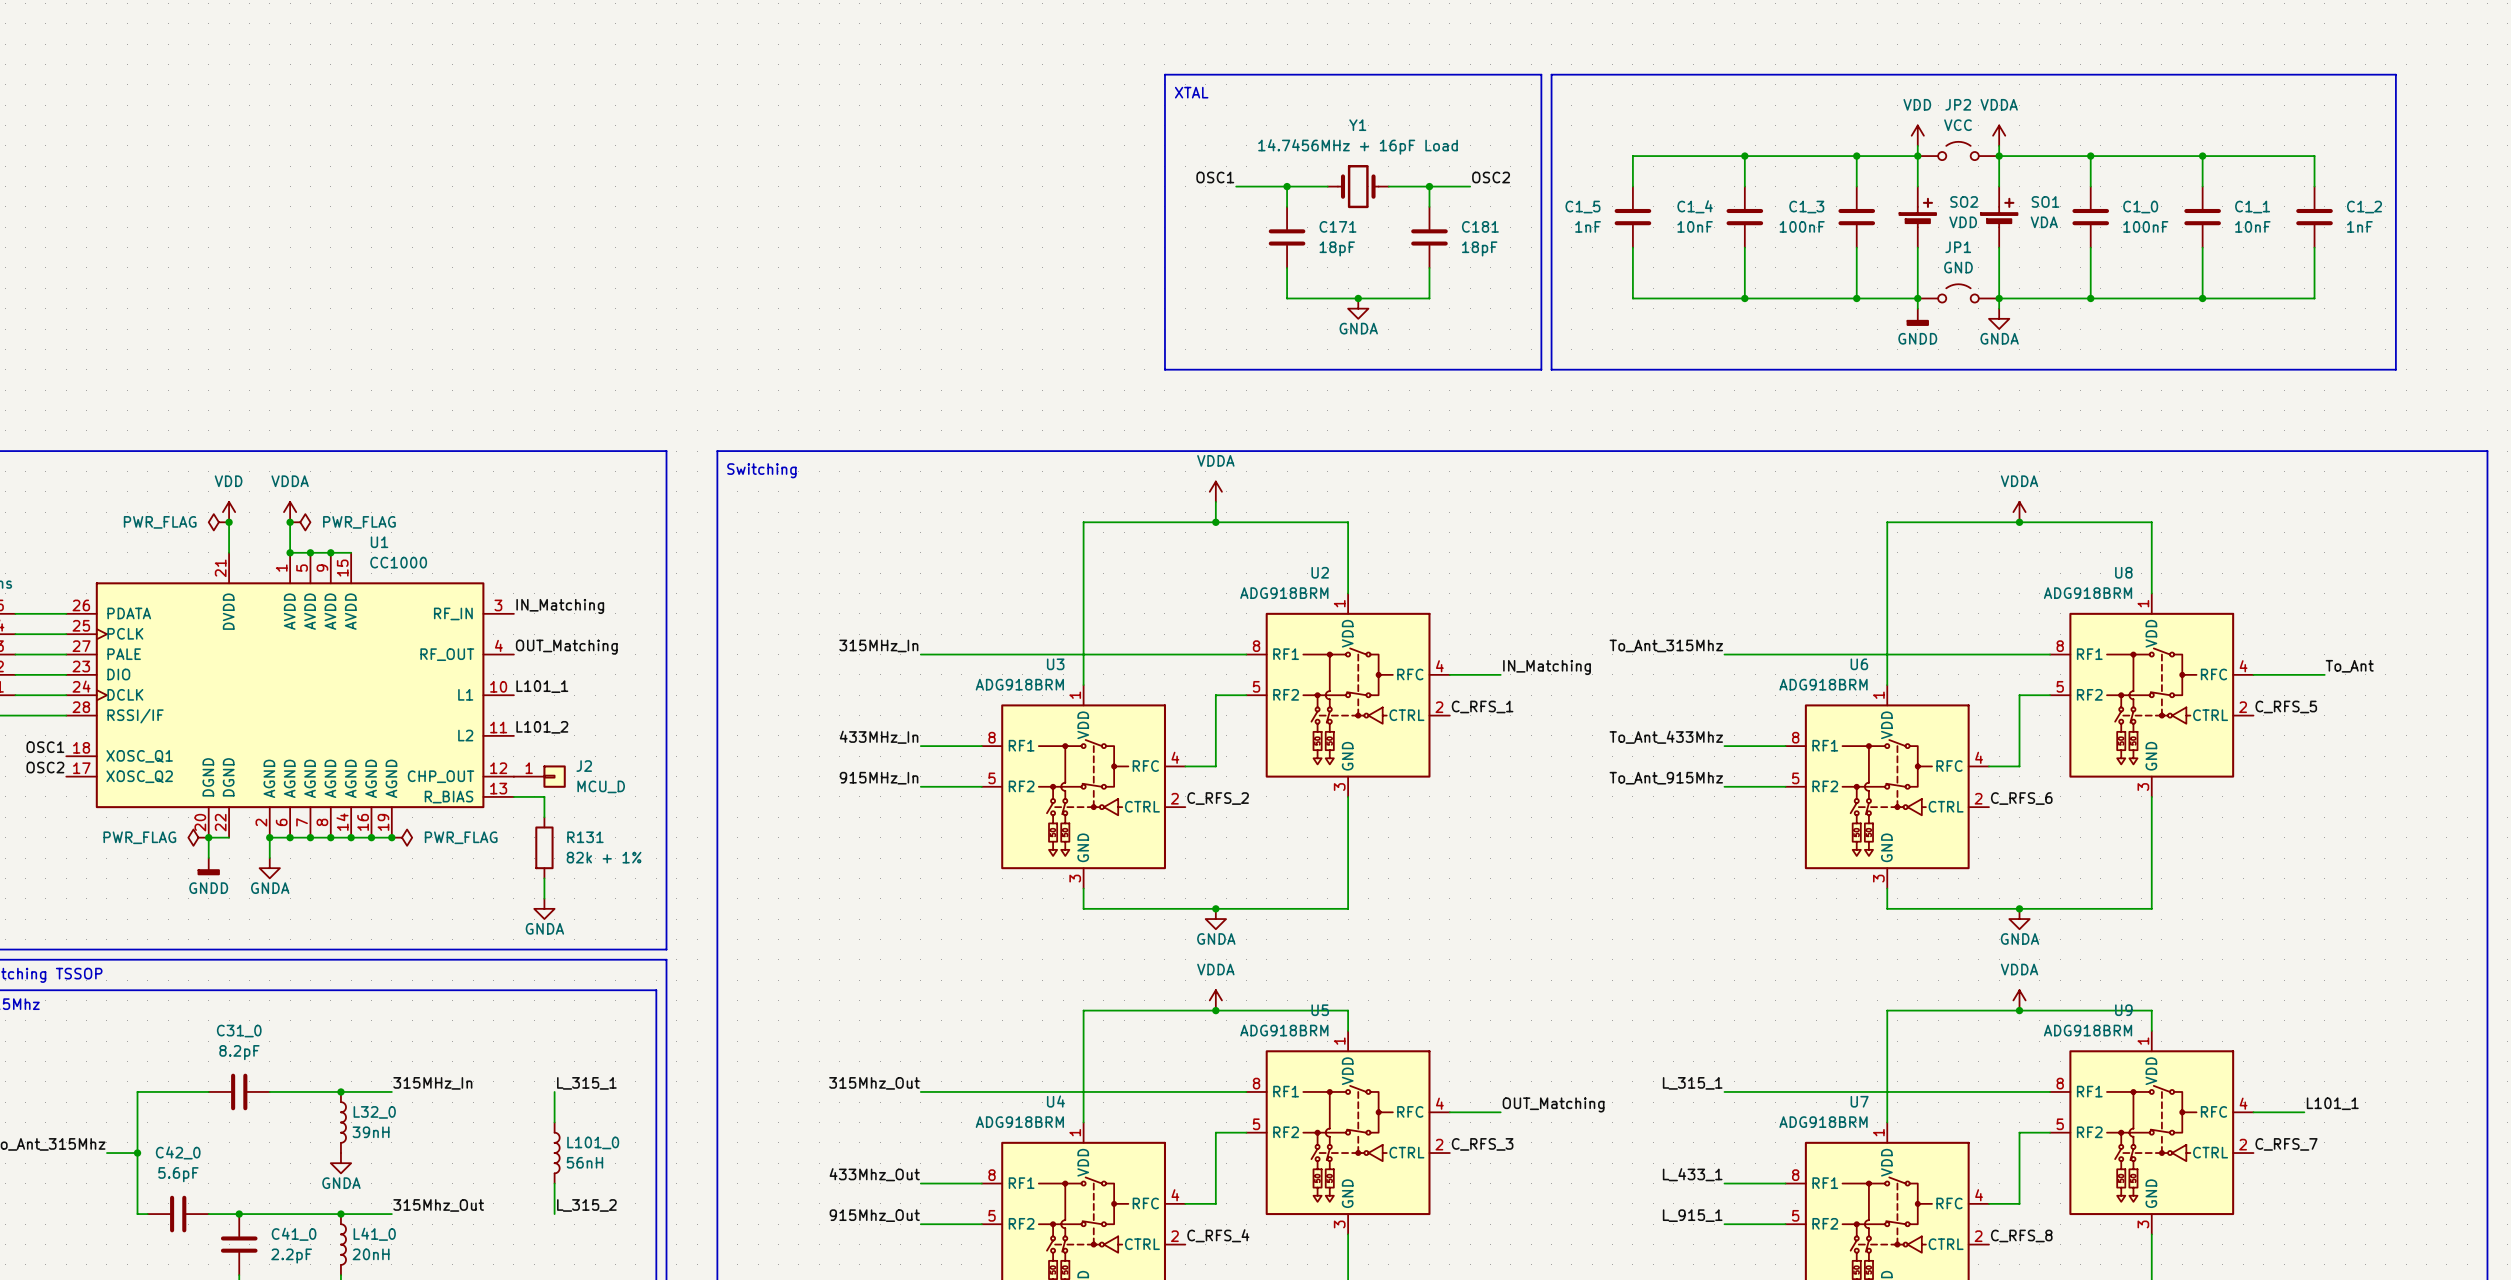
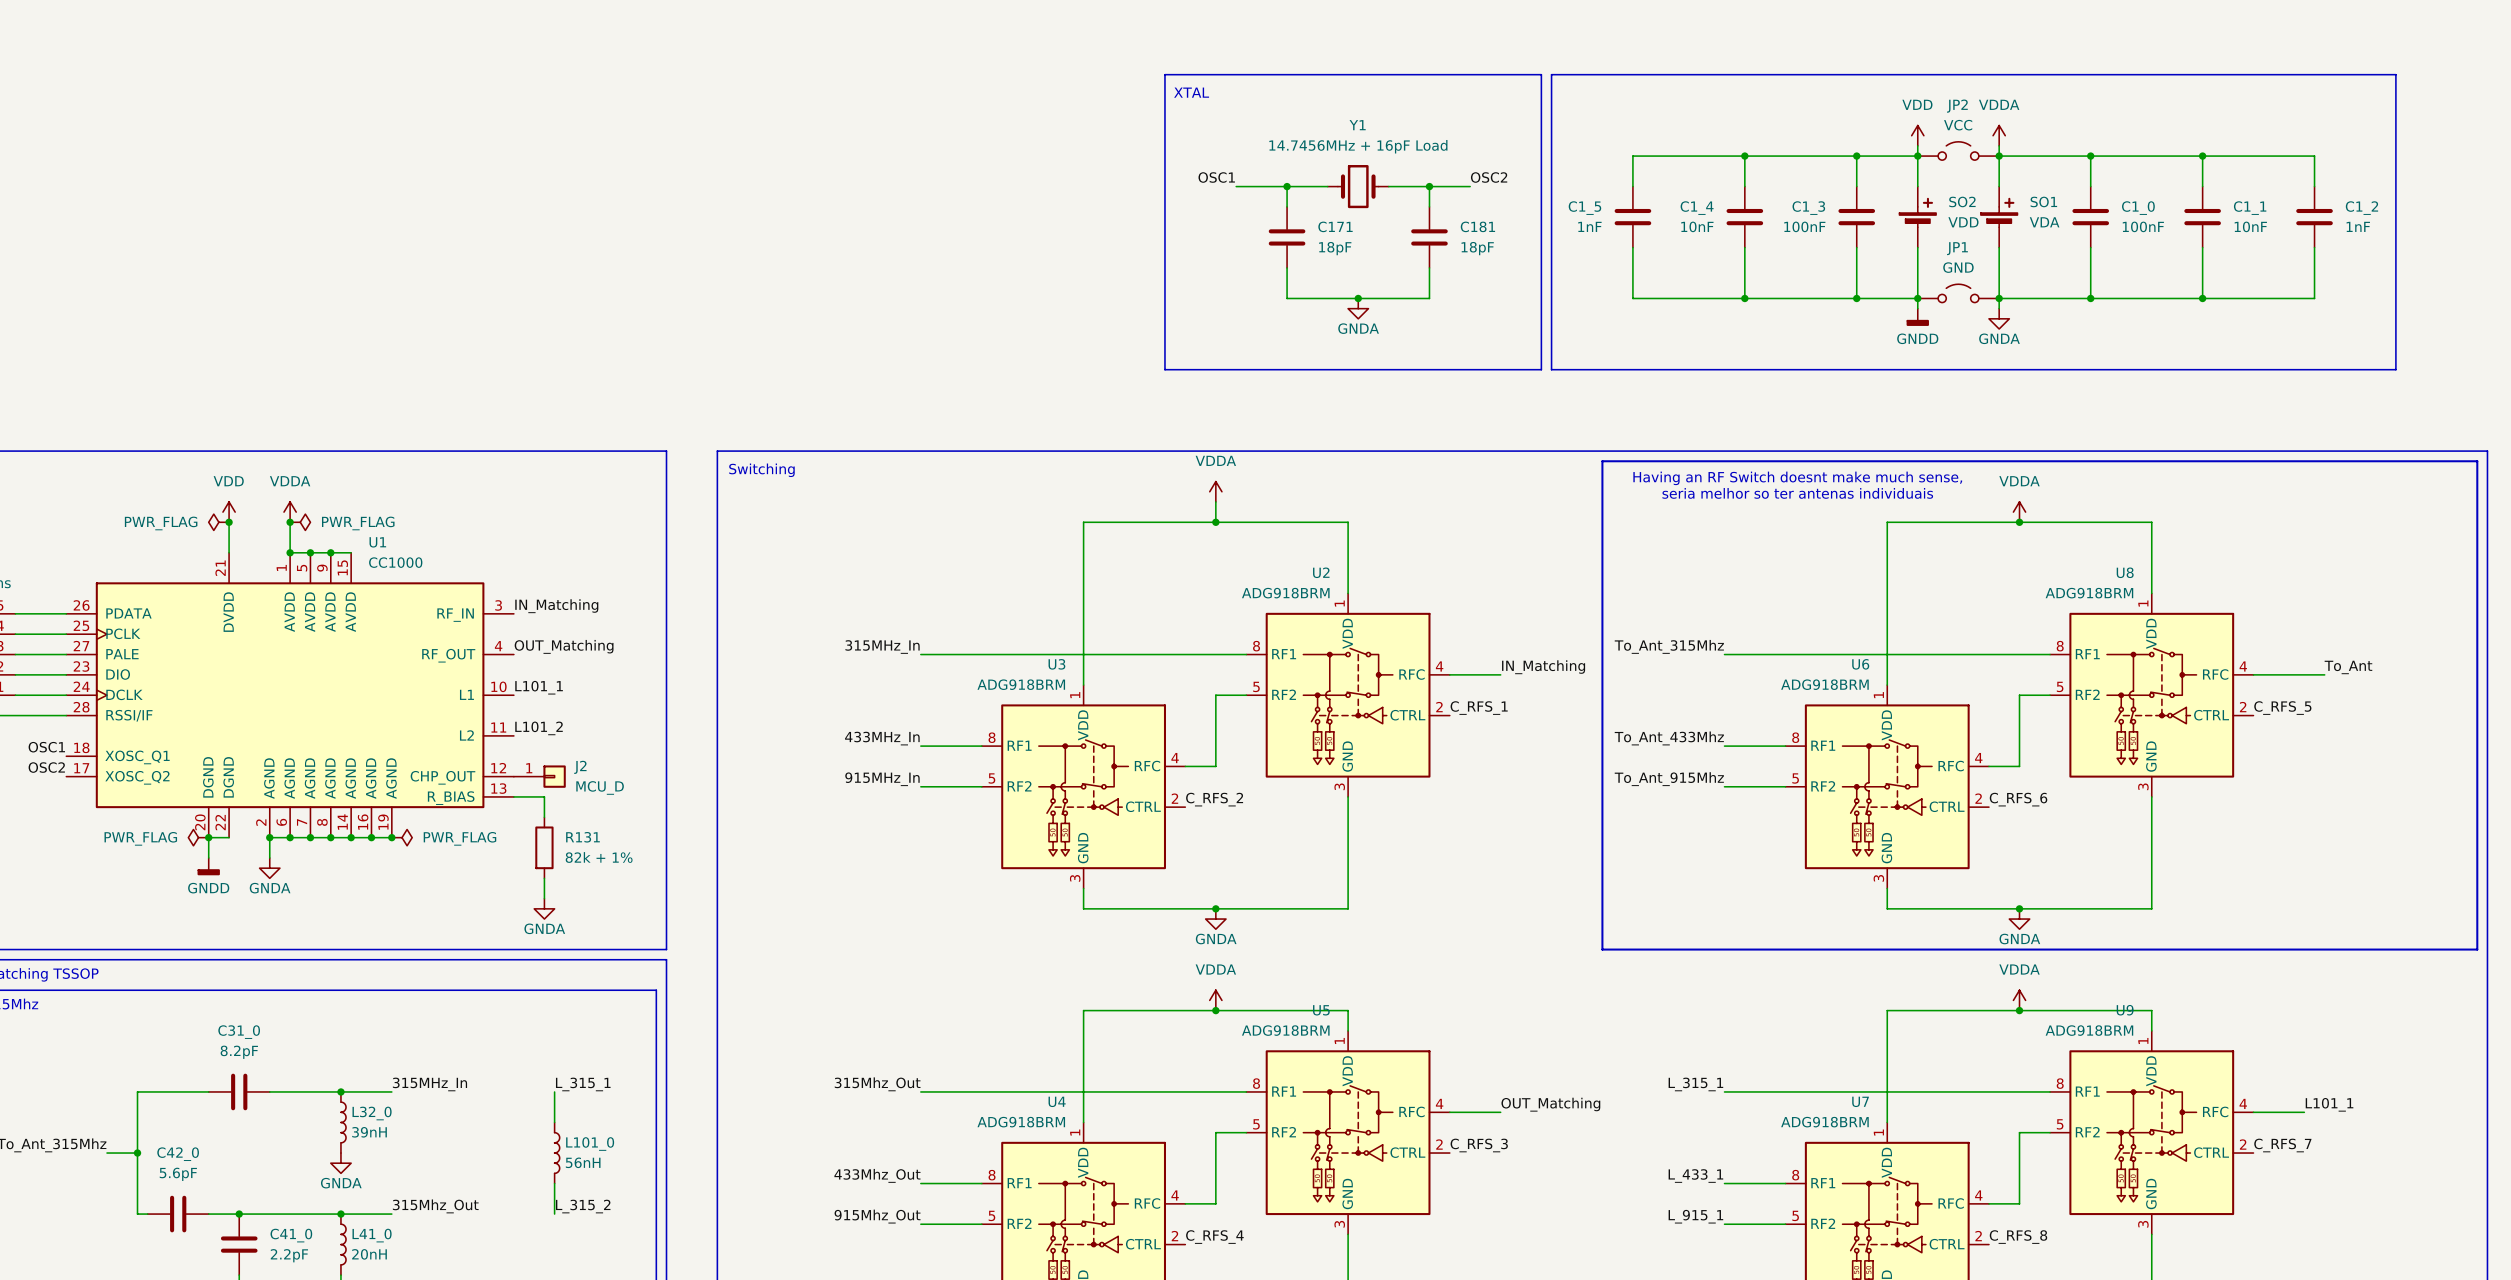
line: none -> (1602, 461) (2477, 461) (2477, 949) (1602, 949) (1602, 461)
text: none -> Having an RF Switch doesnt make much sense, (1797, 478)
text: none -> seria melhor so ter antenas individuais (1797, 493)

